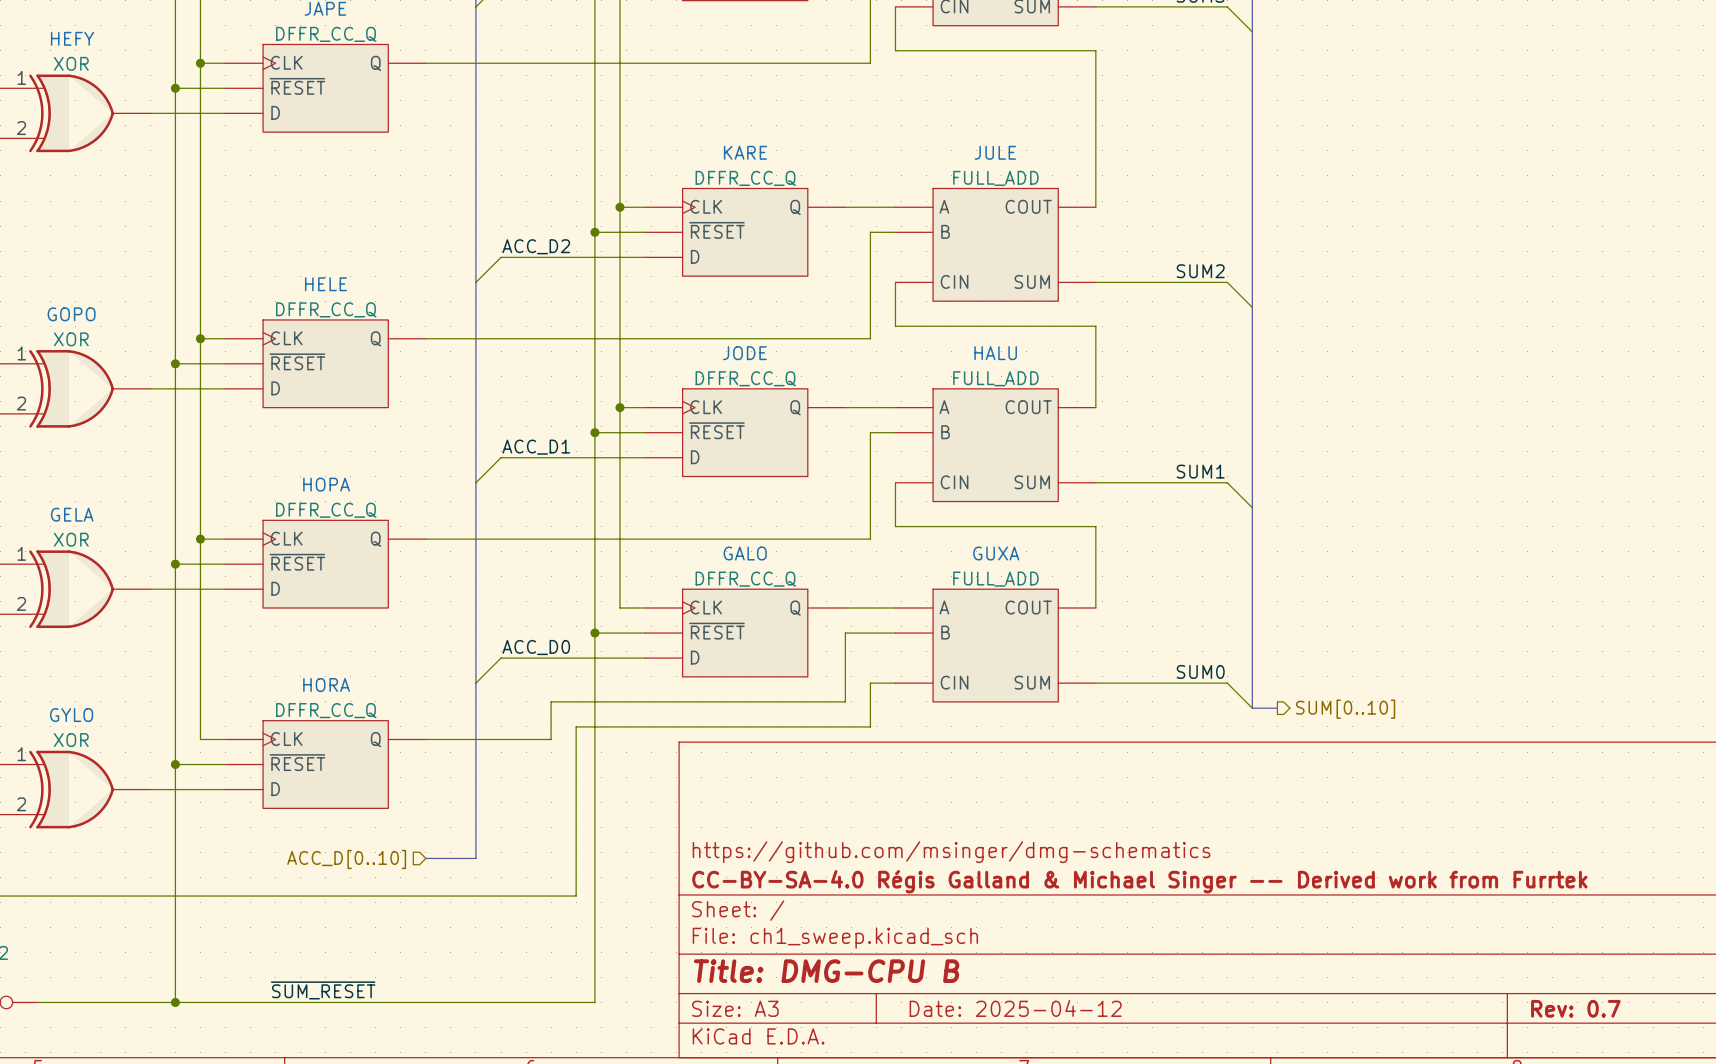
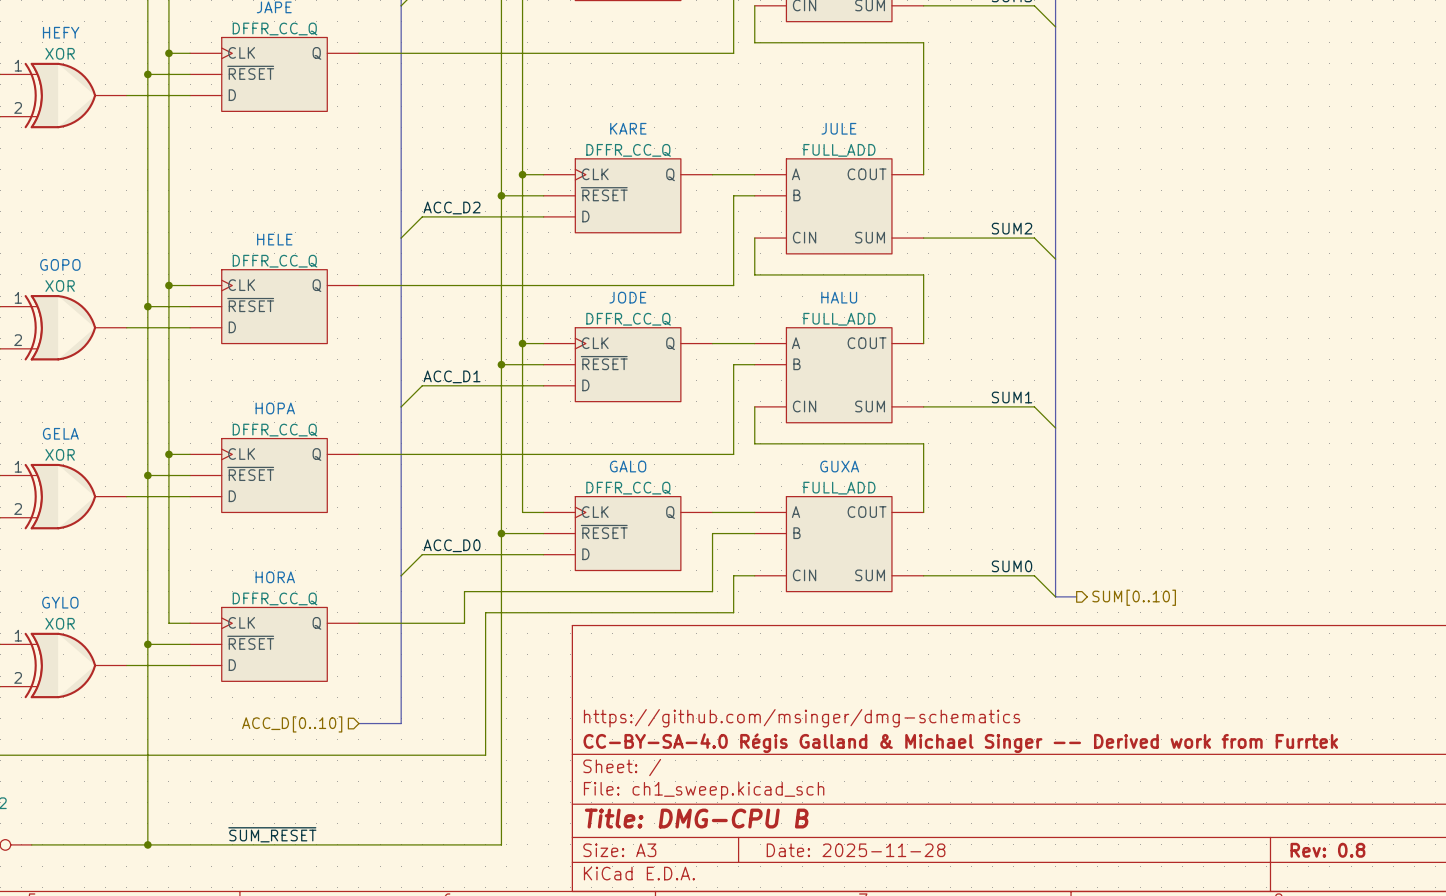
title block: Date: 2025-04-12 (1015, 1008) -> Date: 2025-11-28 (856, 850)
title block: Rev: 0.7 (1575, 1008) -> Rev: 0.8 (1327, 850)

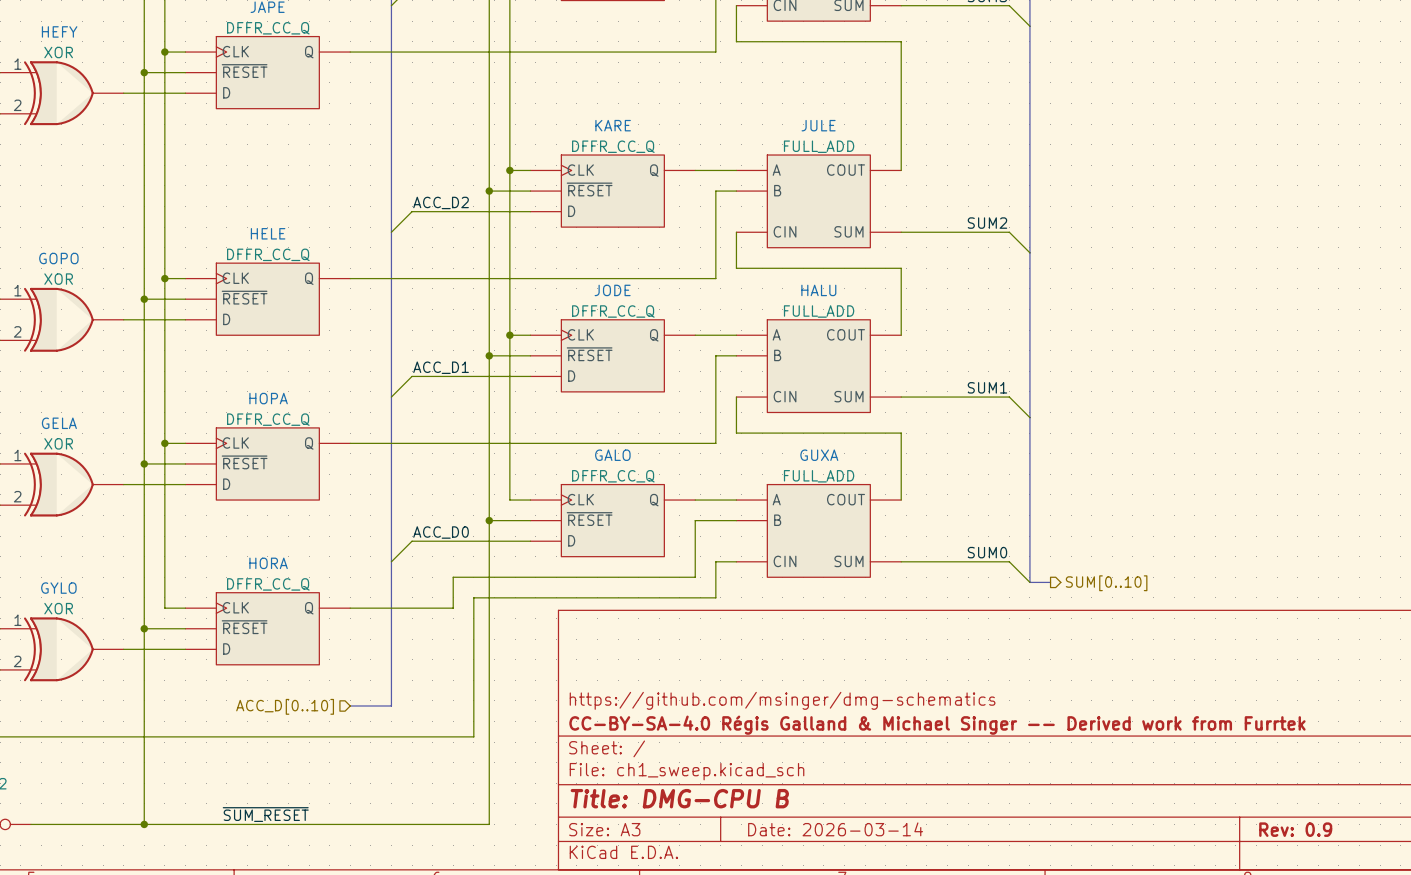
title block: Date: 2025-11-28 (856, 850) -> Date: 2026-03-14 (835, 829)
title block: Rev: 0.8 (1327, 850) -> Rev: 0.9 (1295, 829)

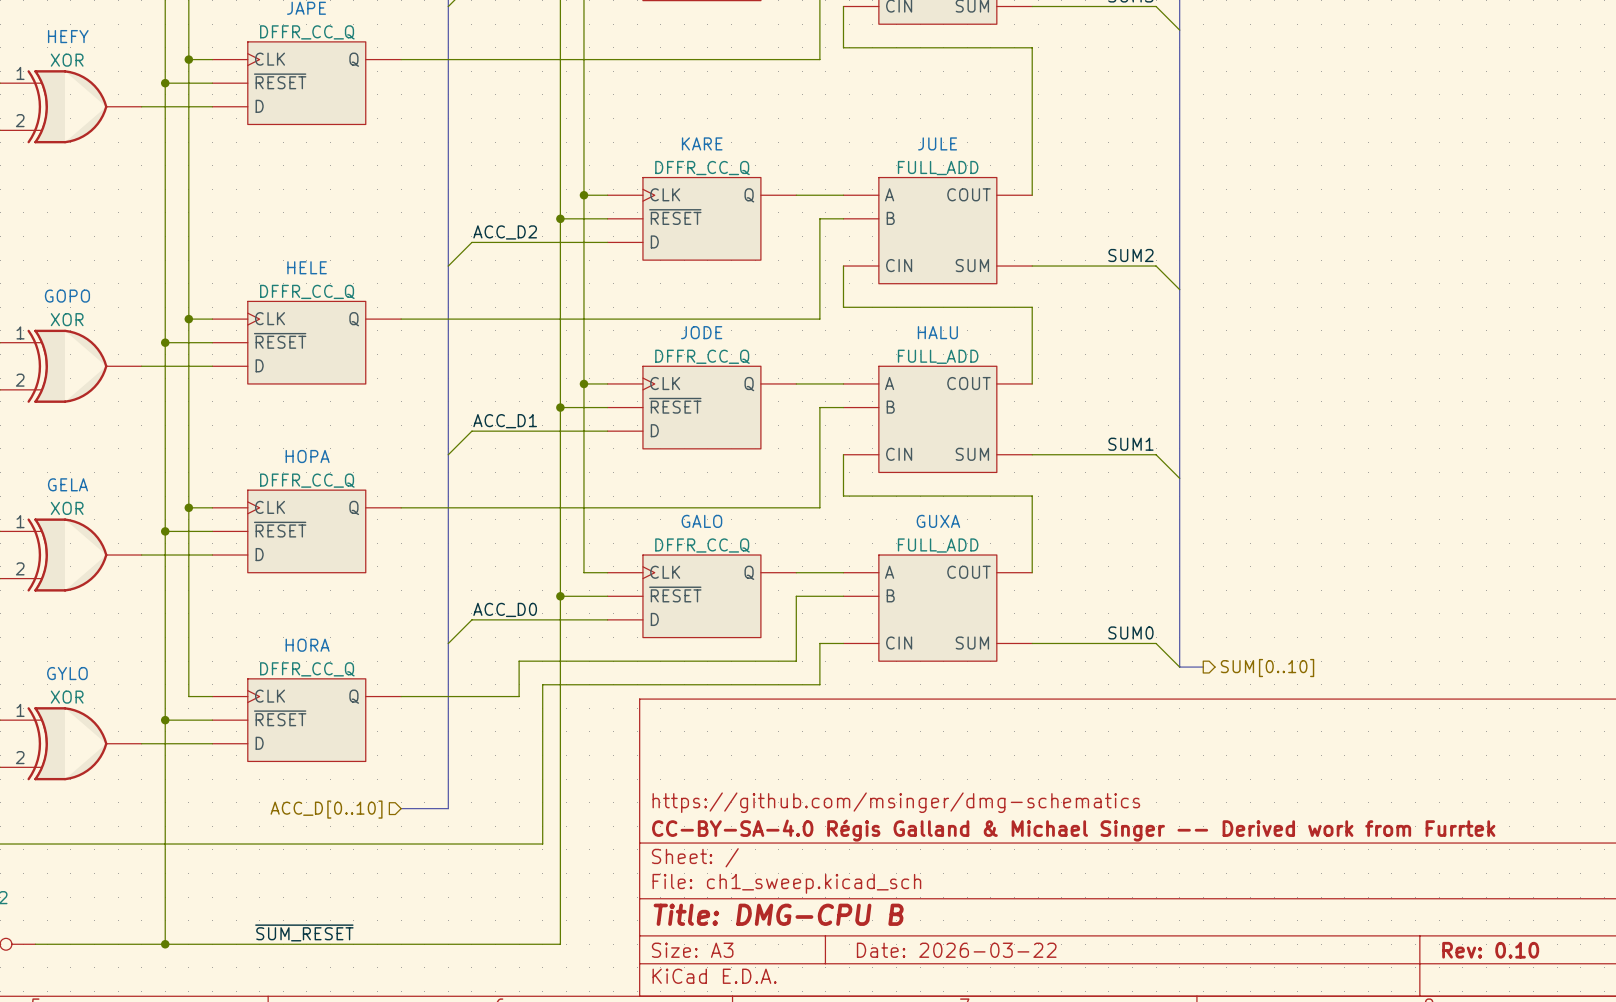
title block: Date: 2026-03-14 (835, 829) -> Date: 2026-03-22 (956, 950)
title block: Rev: 0.9 (1295, 829) -> Rev: 0.10 (1490, 950)

